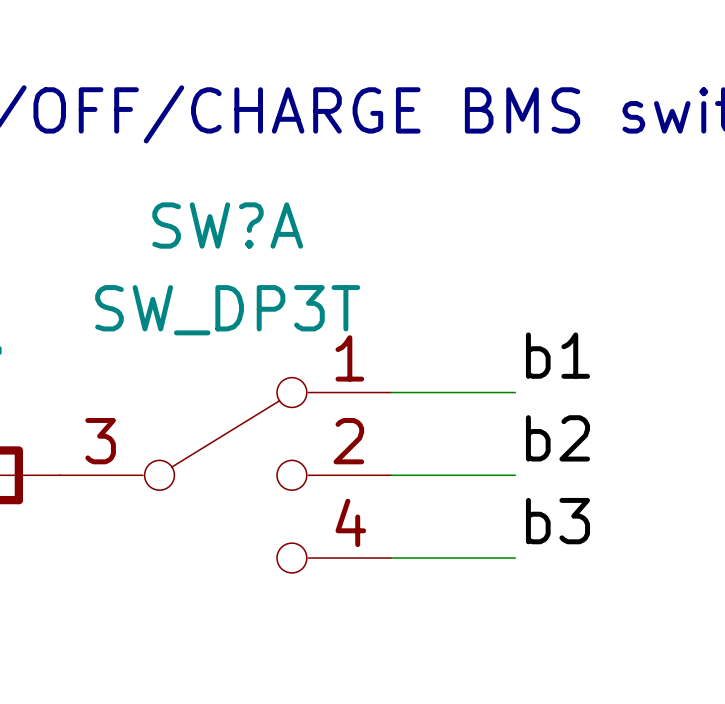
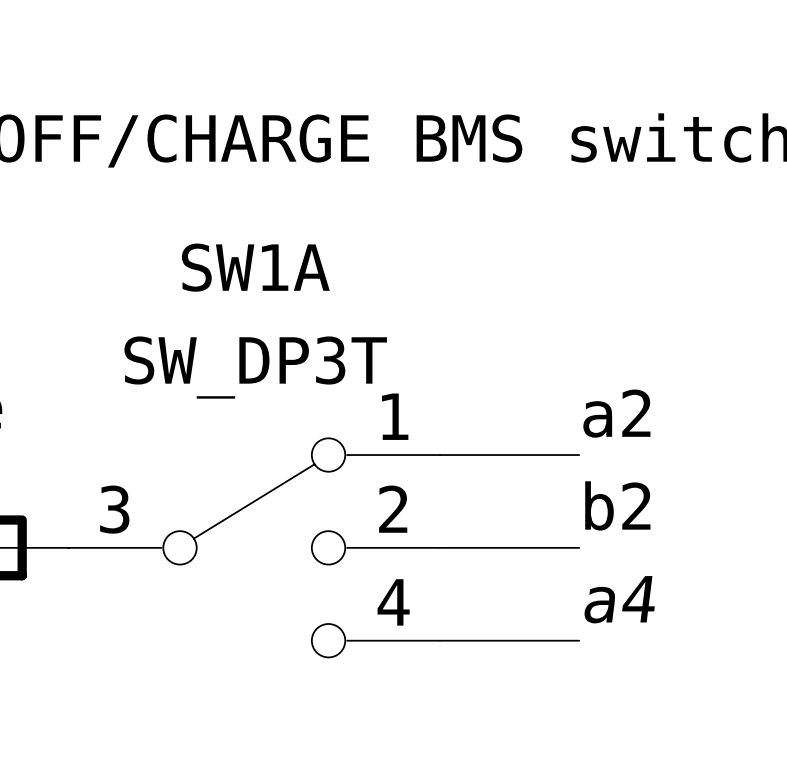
SW?A name: SW?A (227, 225) -> SW1A (255, 267)
label: b1 (557, 355) -> a2 (616, 413)
label: b3 (557, 521) -> a4 (619, 599)

